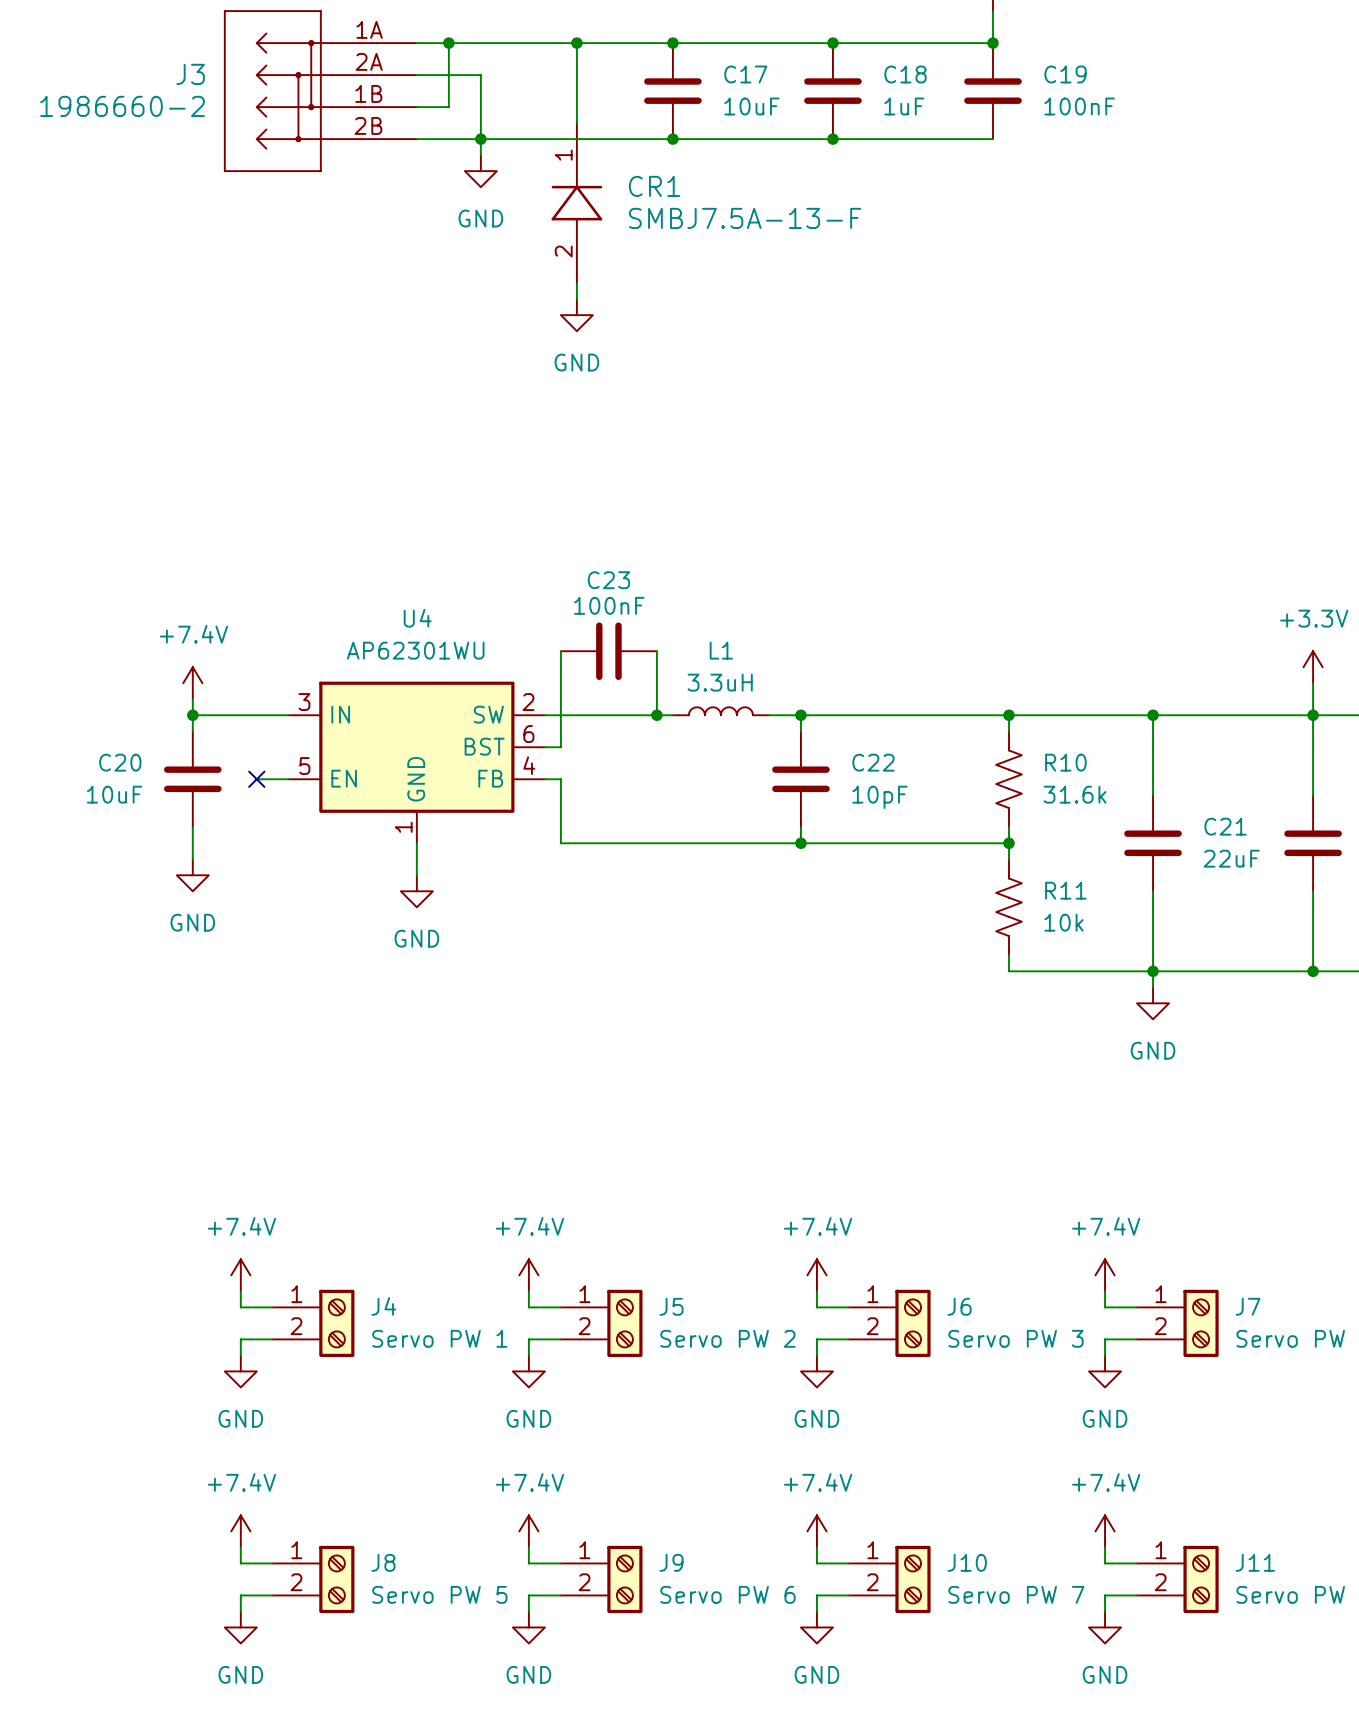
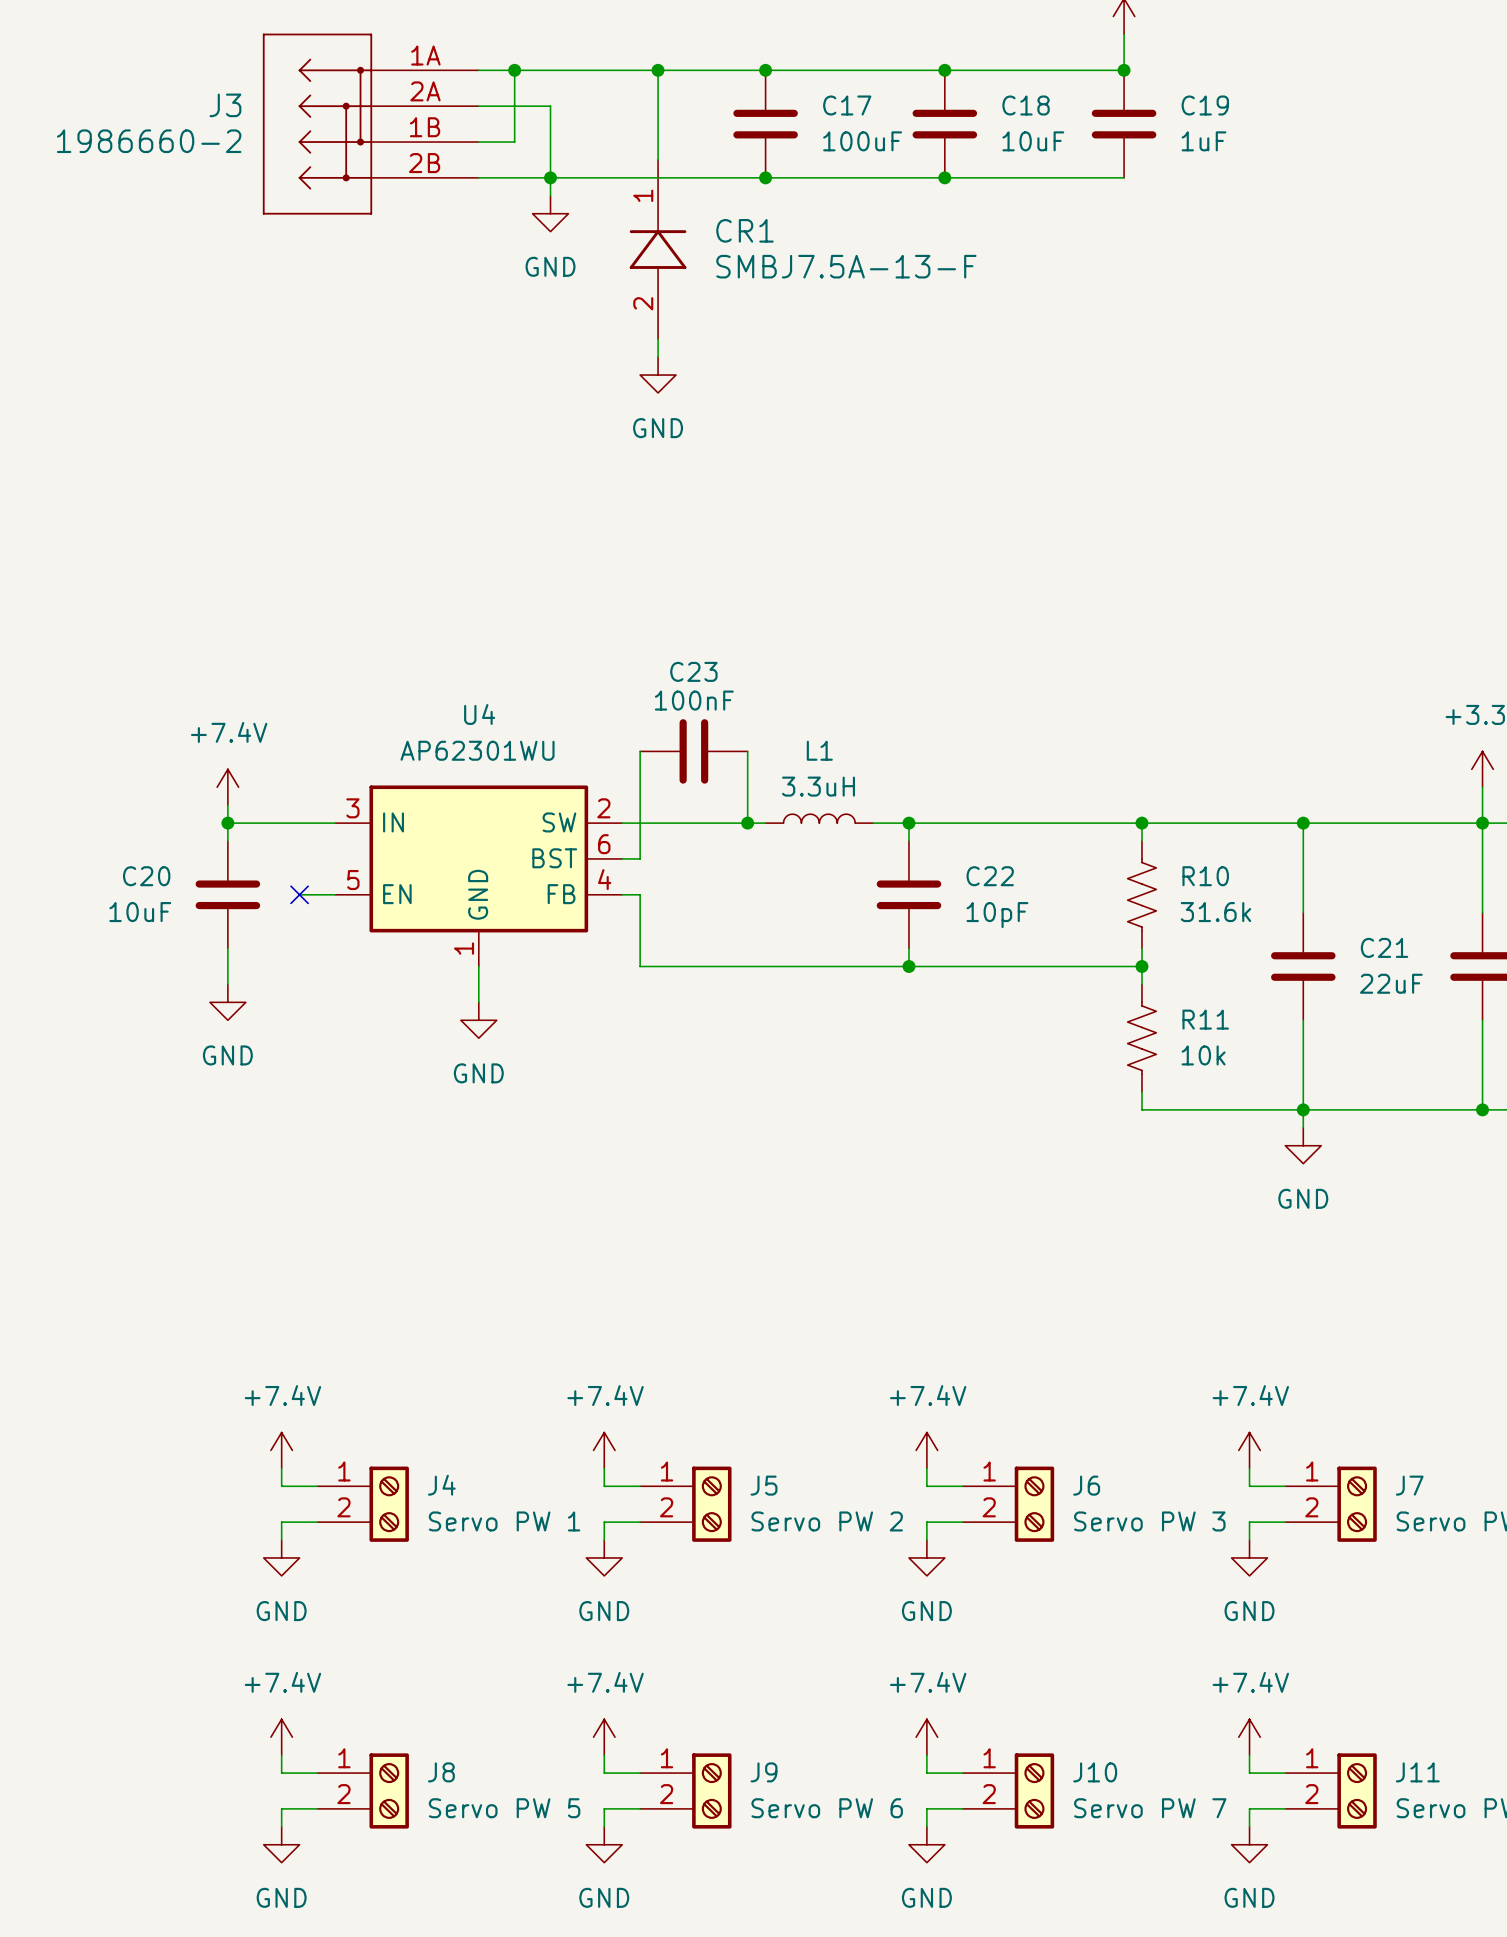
C17 value: 10uF (751, 106) -> 100uF (862, 141)
C18 value: 1uF (904, 106) -> 10uF (1033, 141)
C19 value: 100nF (1079, 106) -> 1uF (1204, 141)

